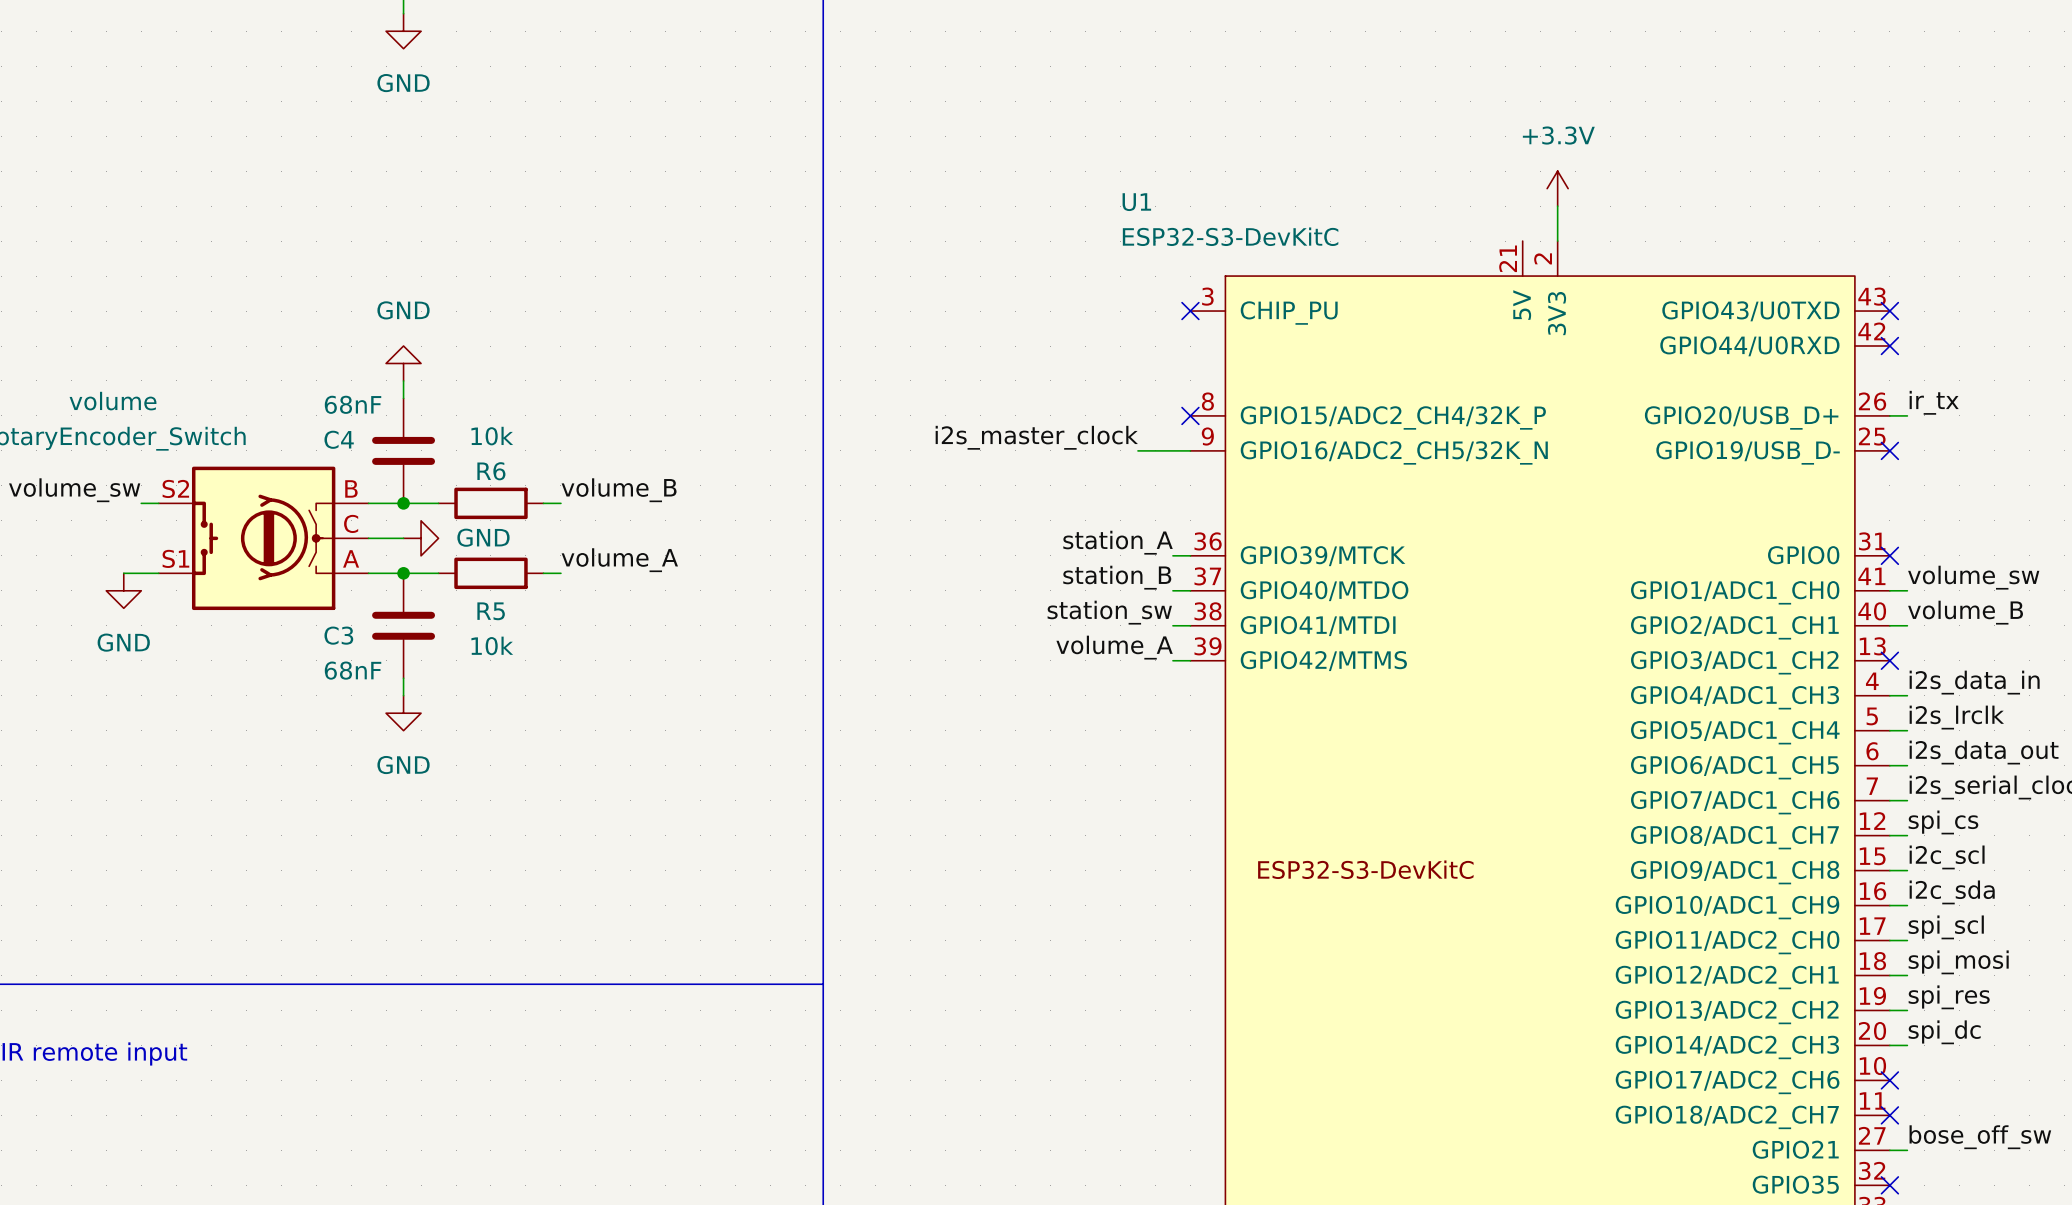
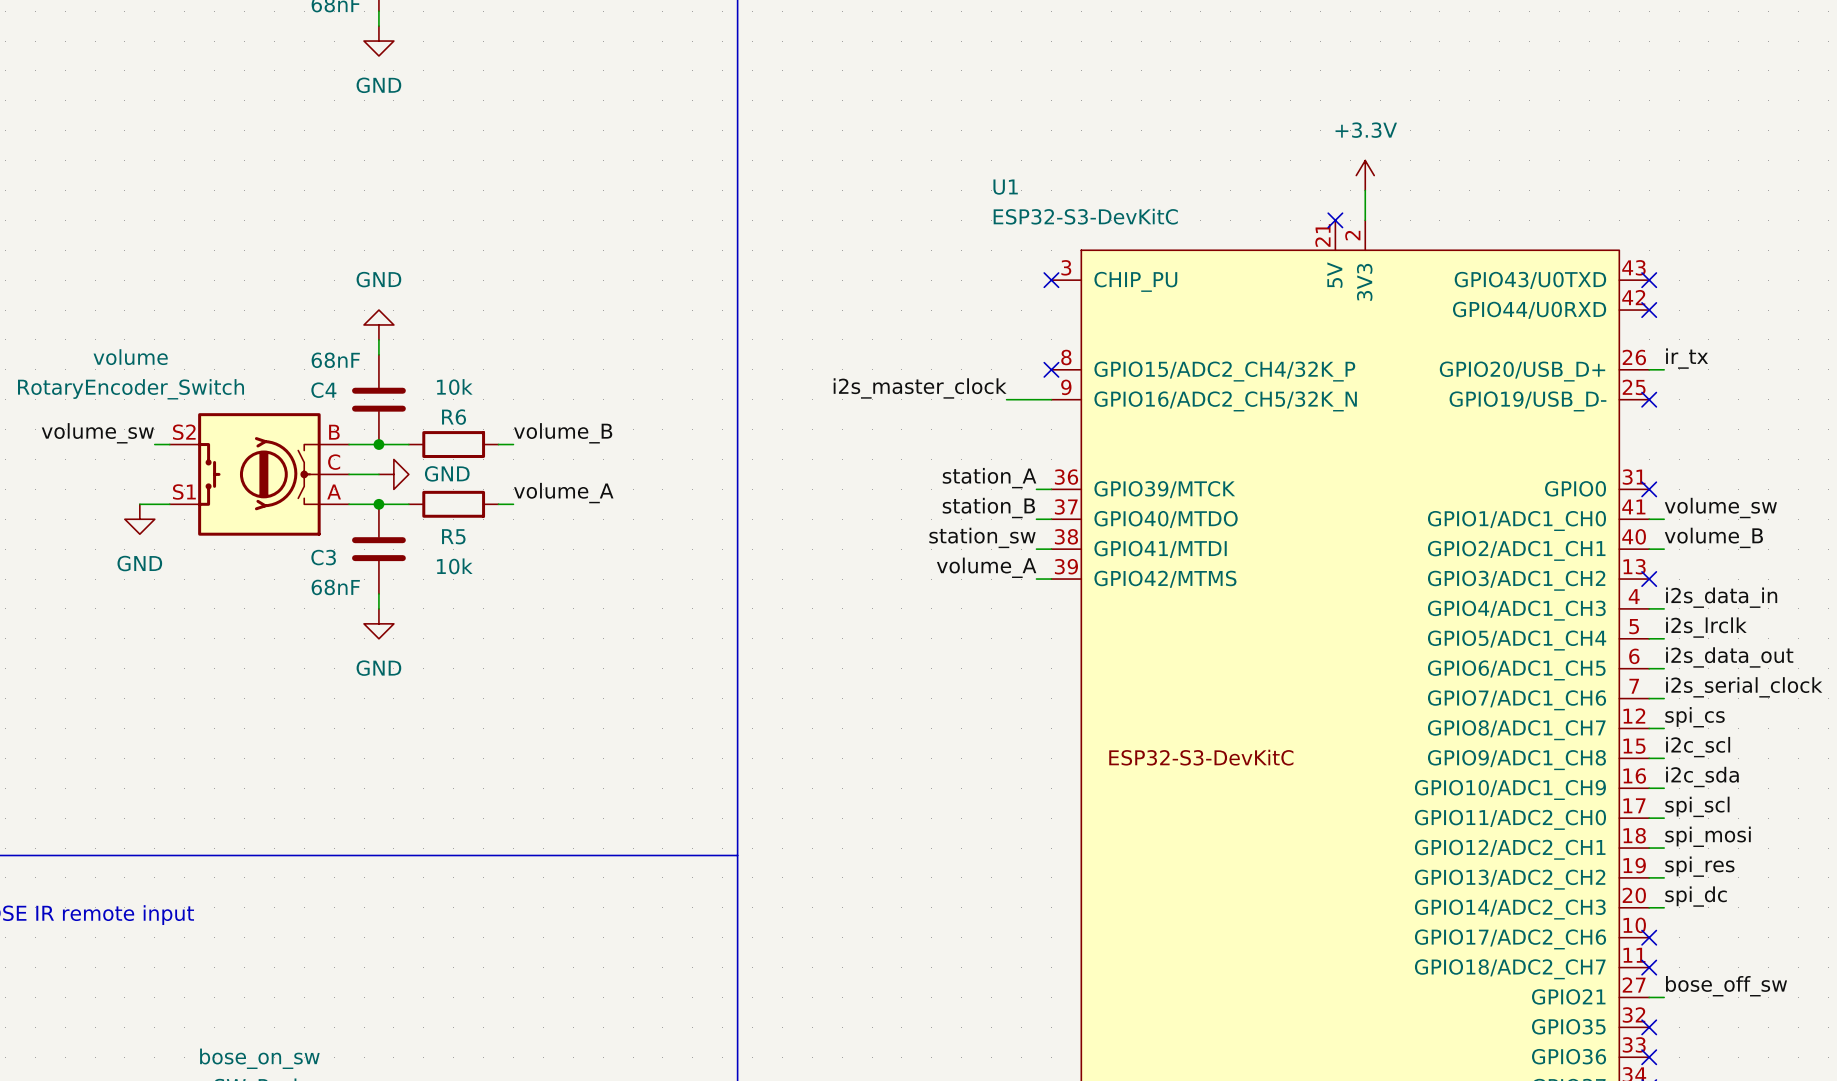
no-connect mark: none -> (1335, 220)

